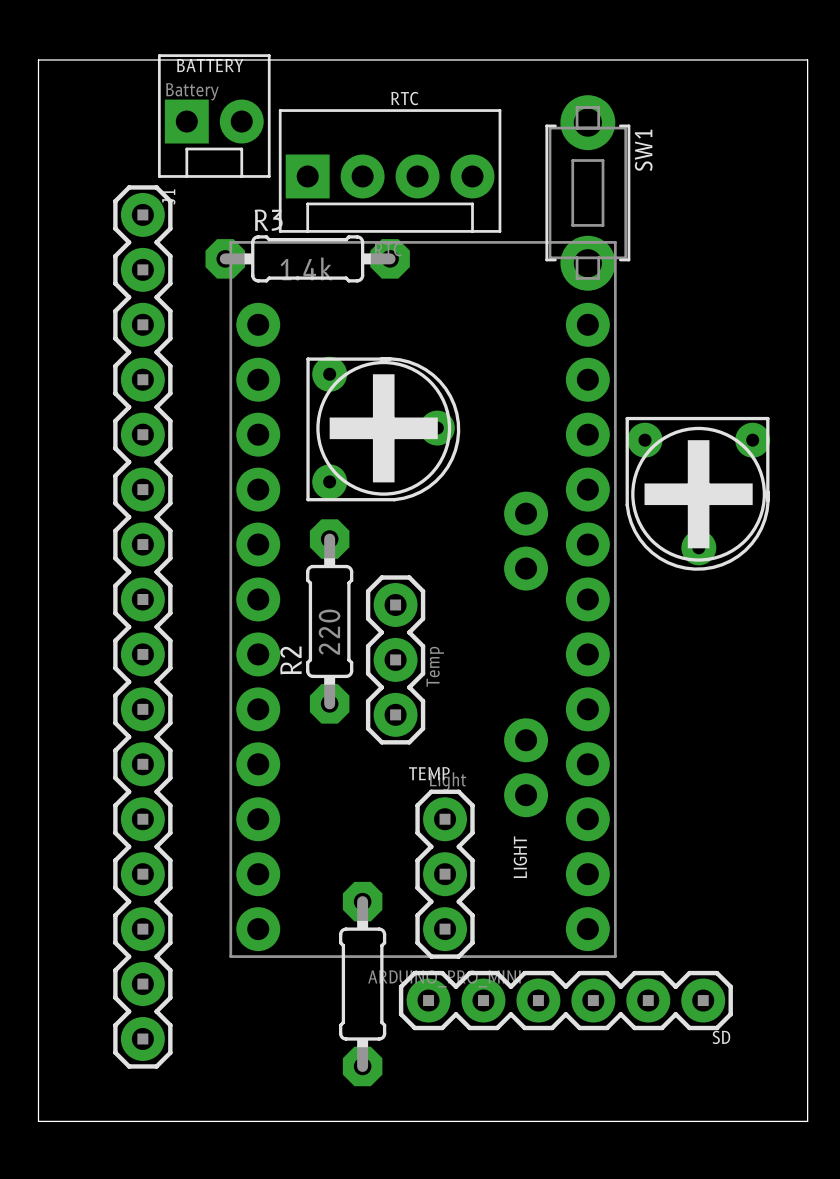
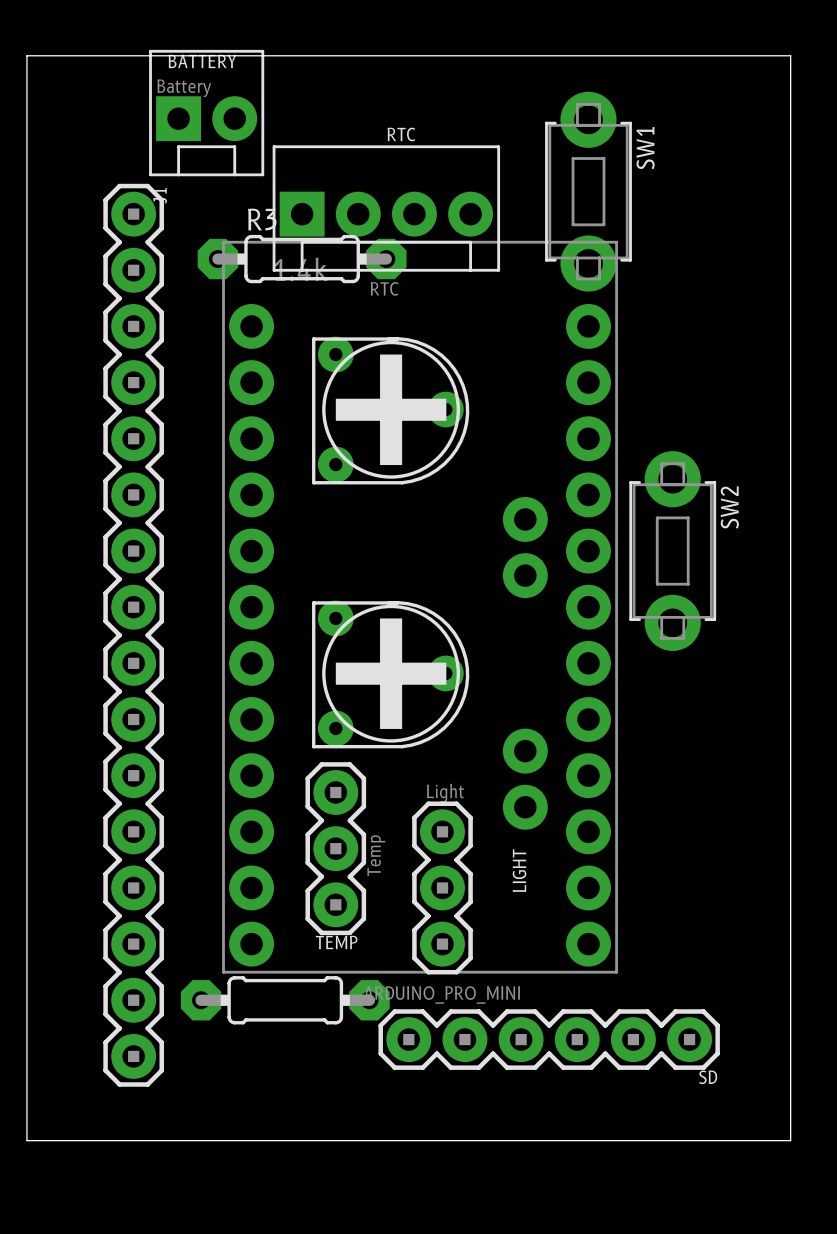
board edge: (785, 60) (807, 60) (807, 1121) (785, 1121) -> (790, 55) (790, 1140)
RTC position: (390, 170) -> (386, 208)
part position: (383, 429) -> (390, 410)
part: (697, 493) -> none
SW2: none -> (672, 551)
R2: 220 (329, 621) -> none
TEMP position: (395, 659) -> (335, 848)
part: none -> (390, 674)
TEMP name position: TEMP (429, 773) -> TEMP (336, 942)
part rotation: 0° (362, 984) -> 90° clockwise (285, 1000)
SD position: (565, 1000) -> (549, 1039)

